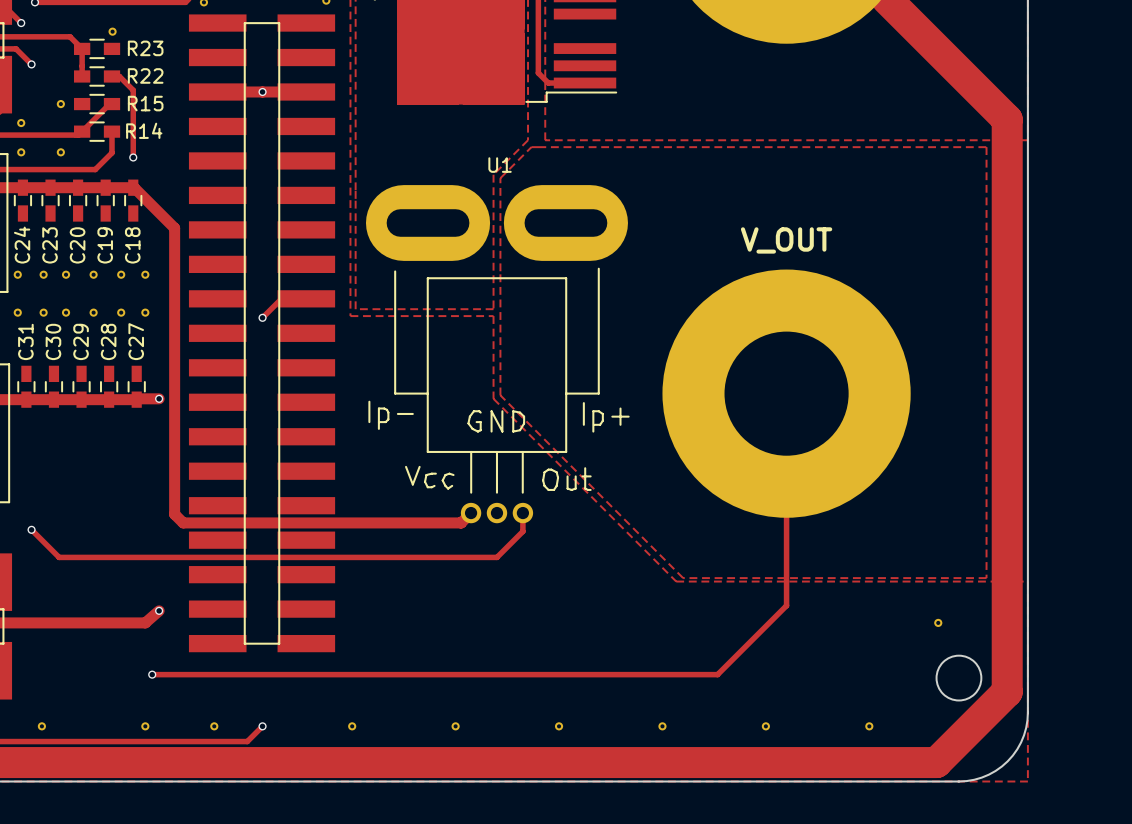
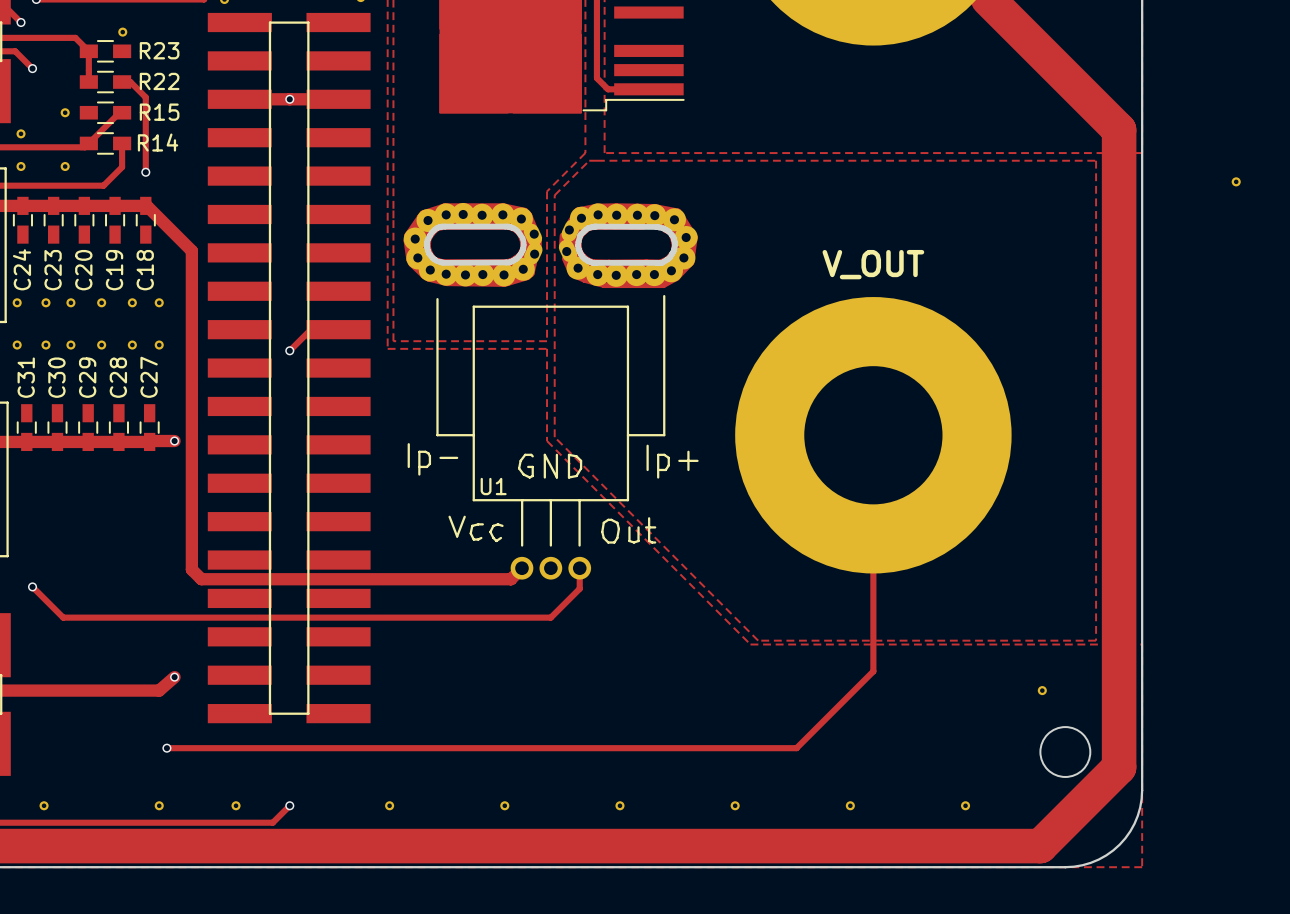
U1 name position: U1 (500, 165) -> U1 (493, 486)
part: none -> (1236, 181)
U1 footprint: [365, 185, 630, 524] -> [403, 202, 699, 580]

